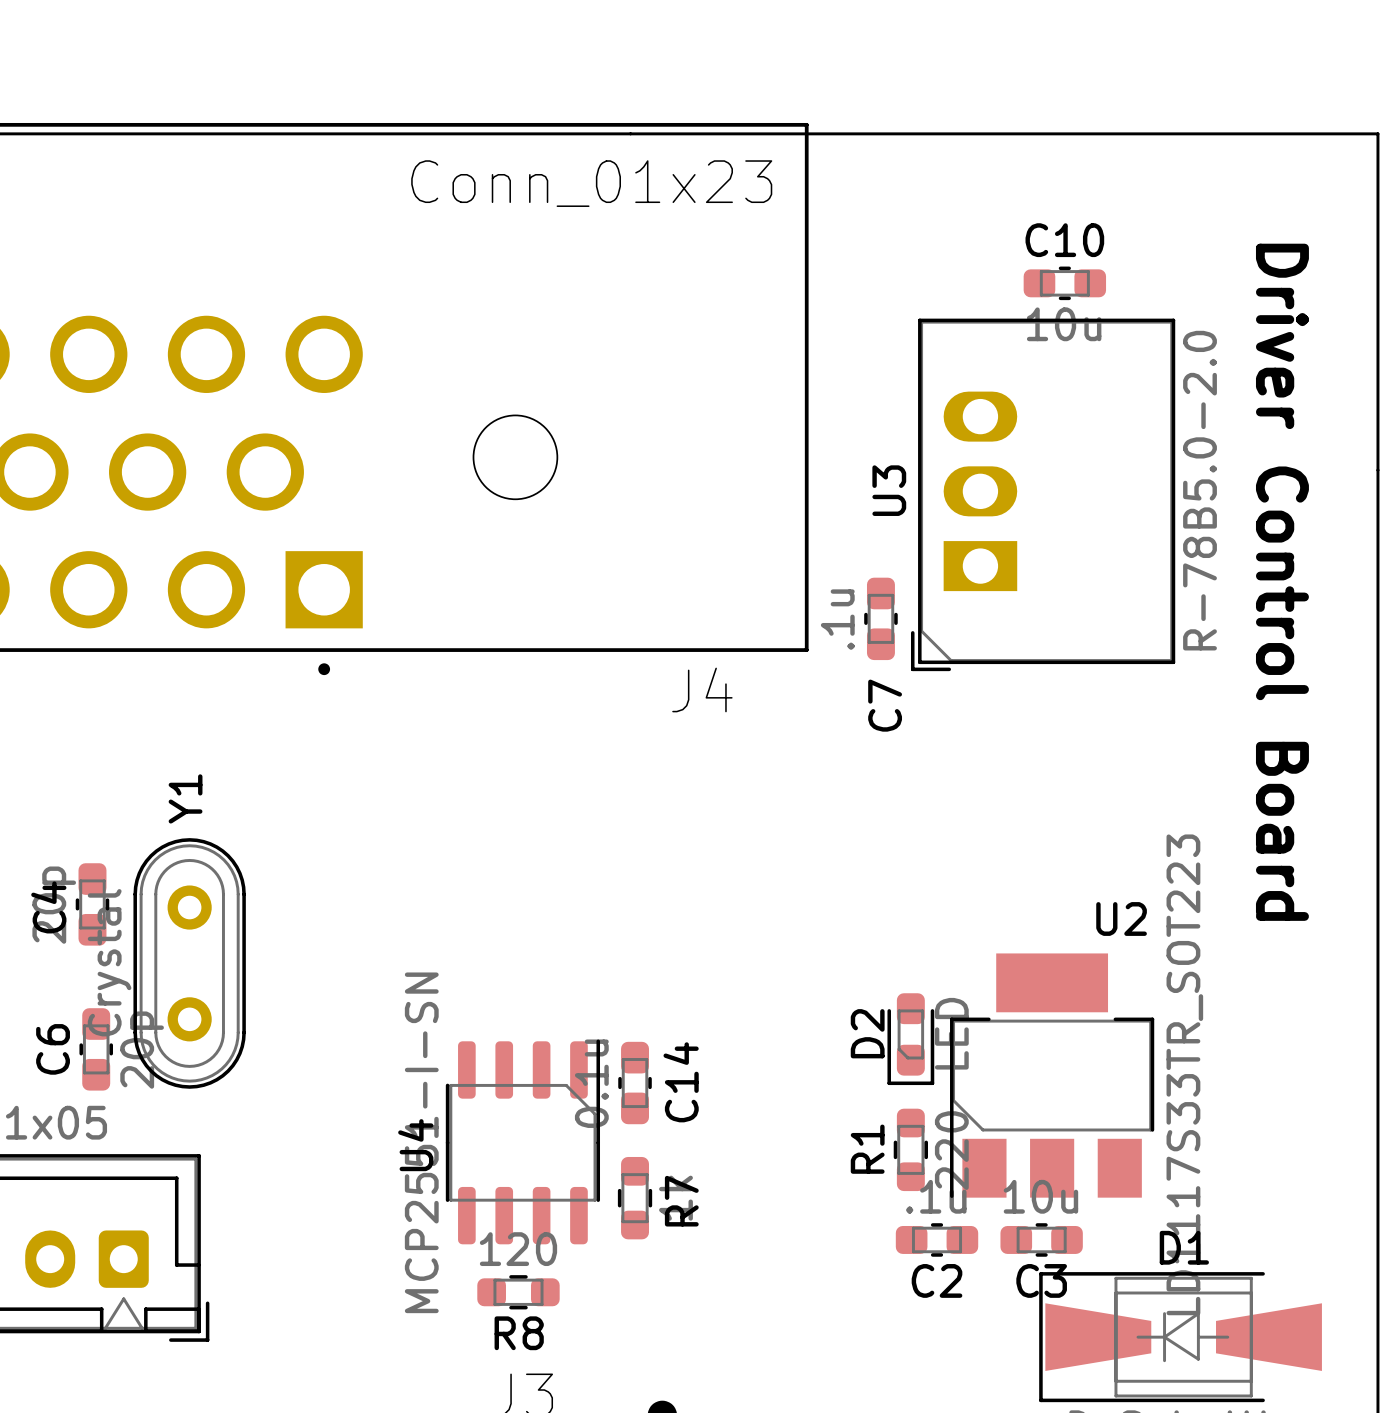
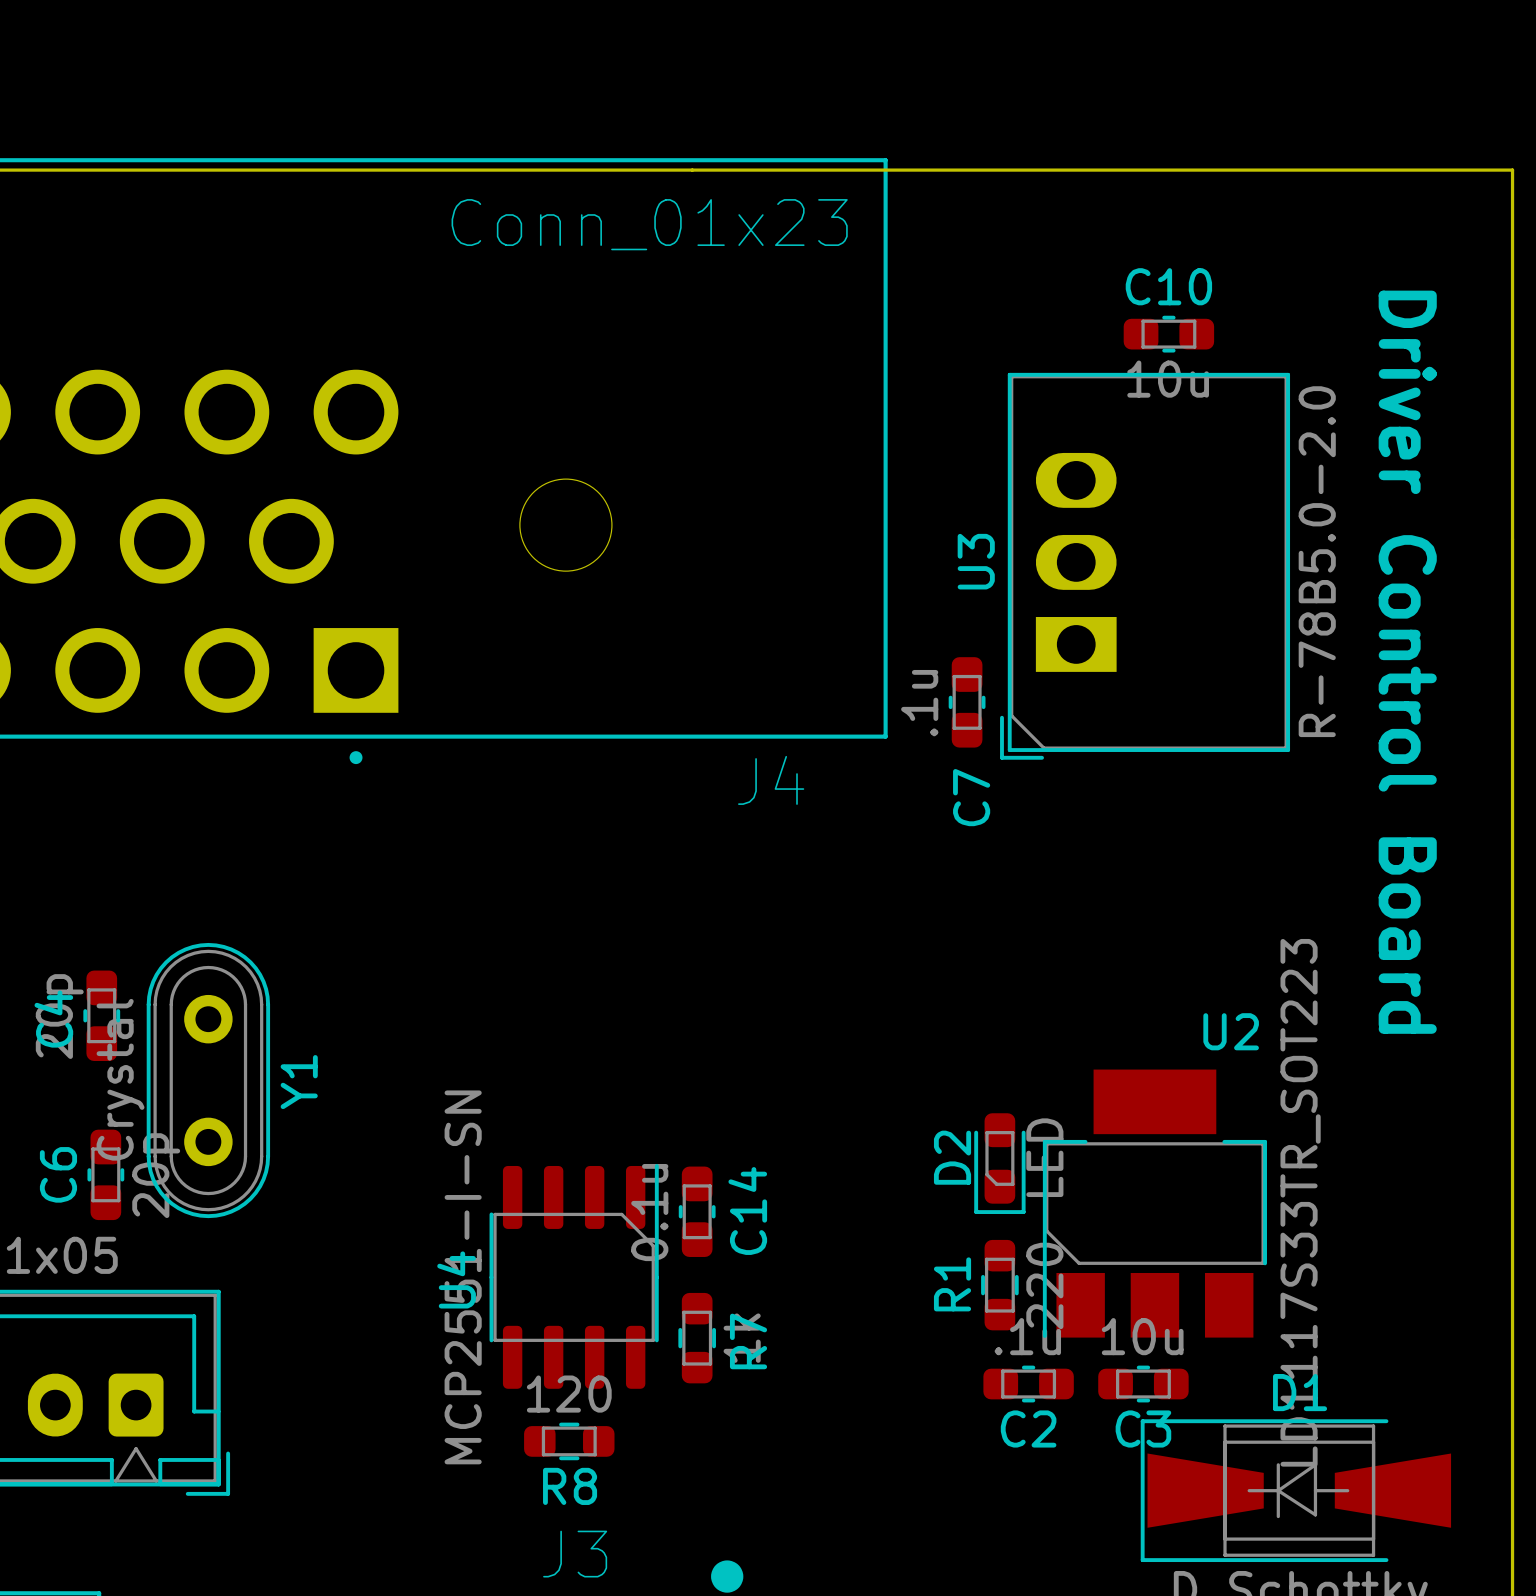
Y1 name position: Y1 (185, 798) -> Y1 (299, 1082)

